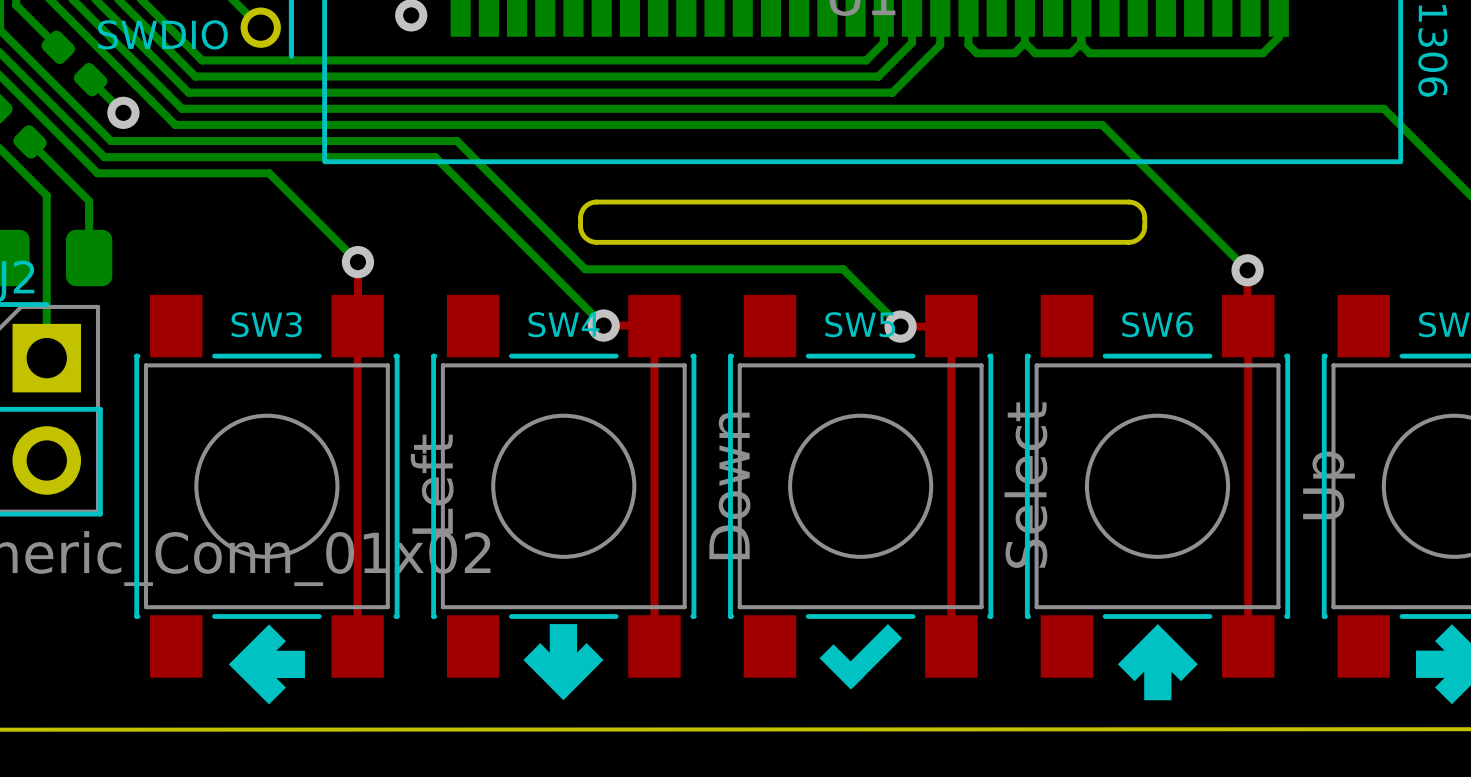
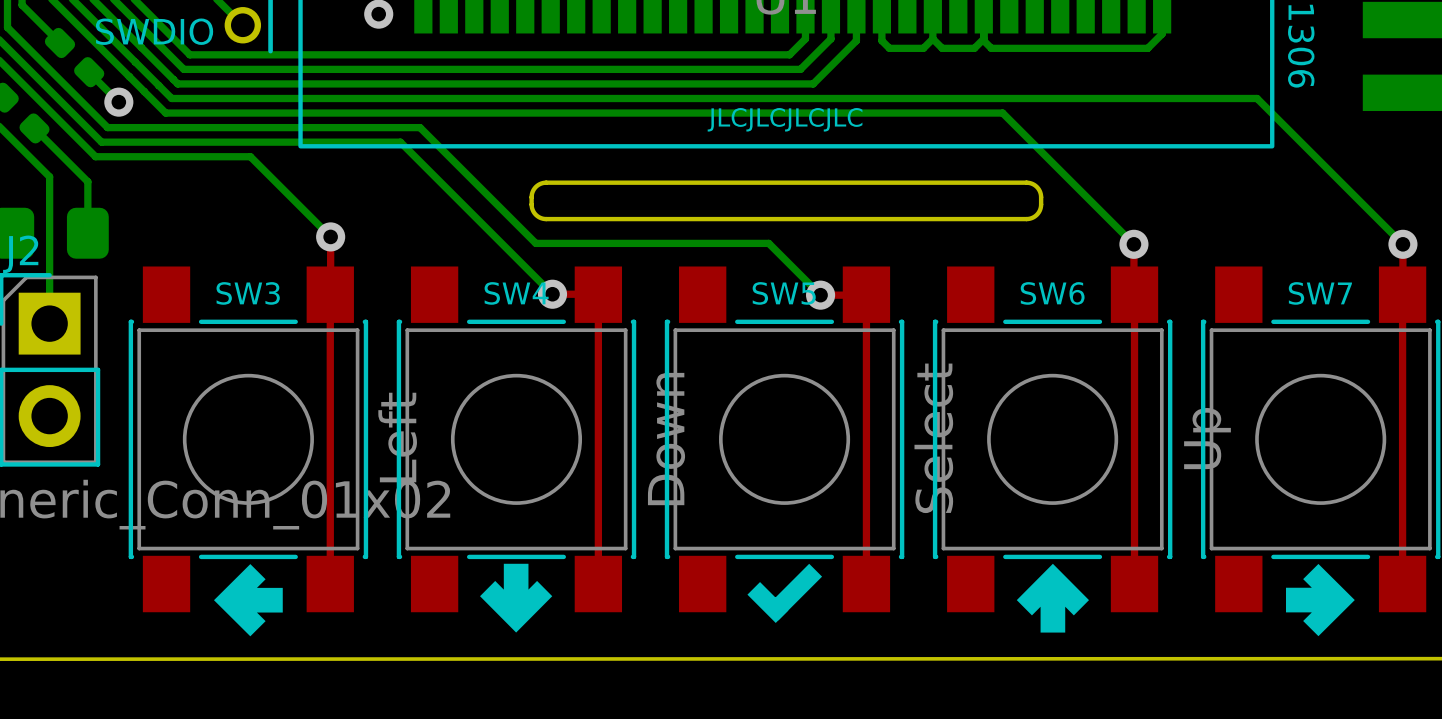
text: none -> JLCJLCJLCJLC (785, 119)

